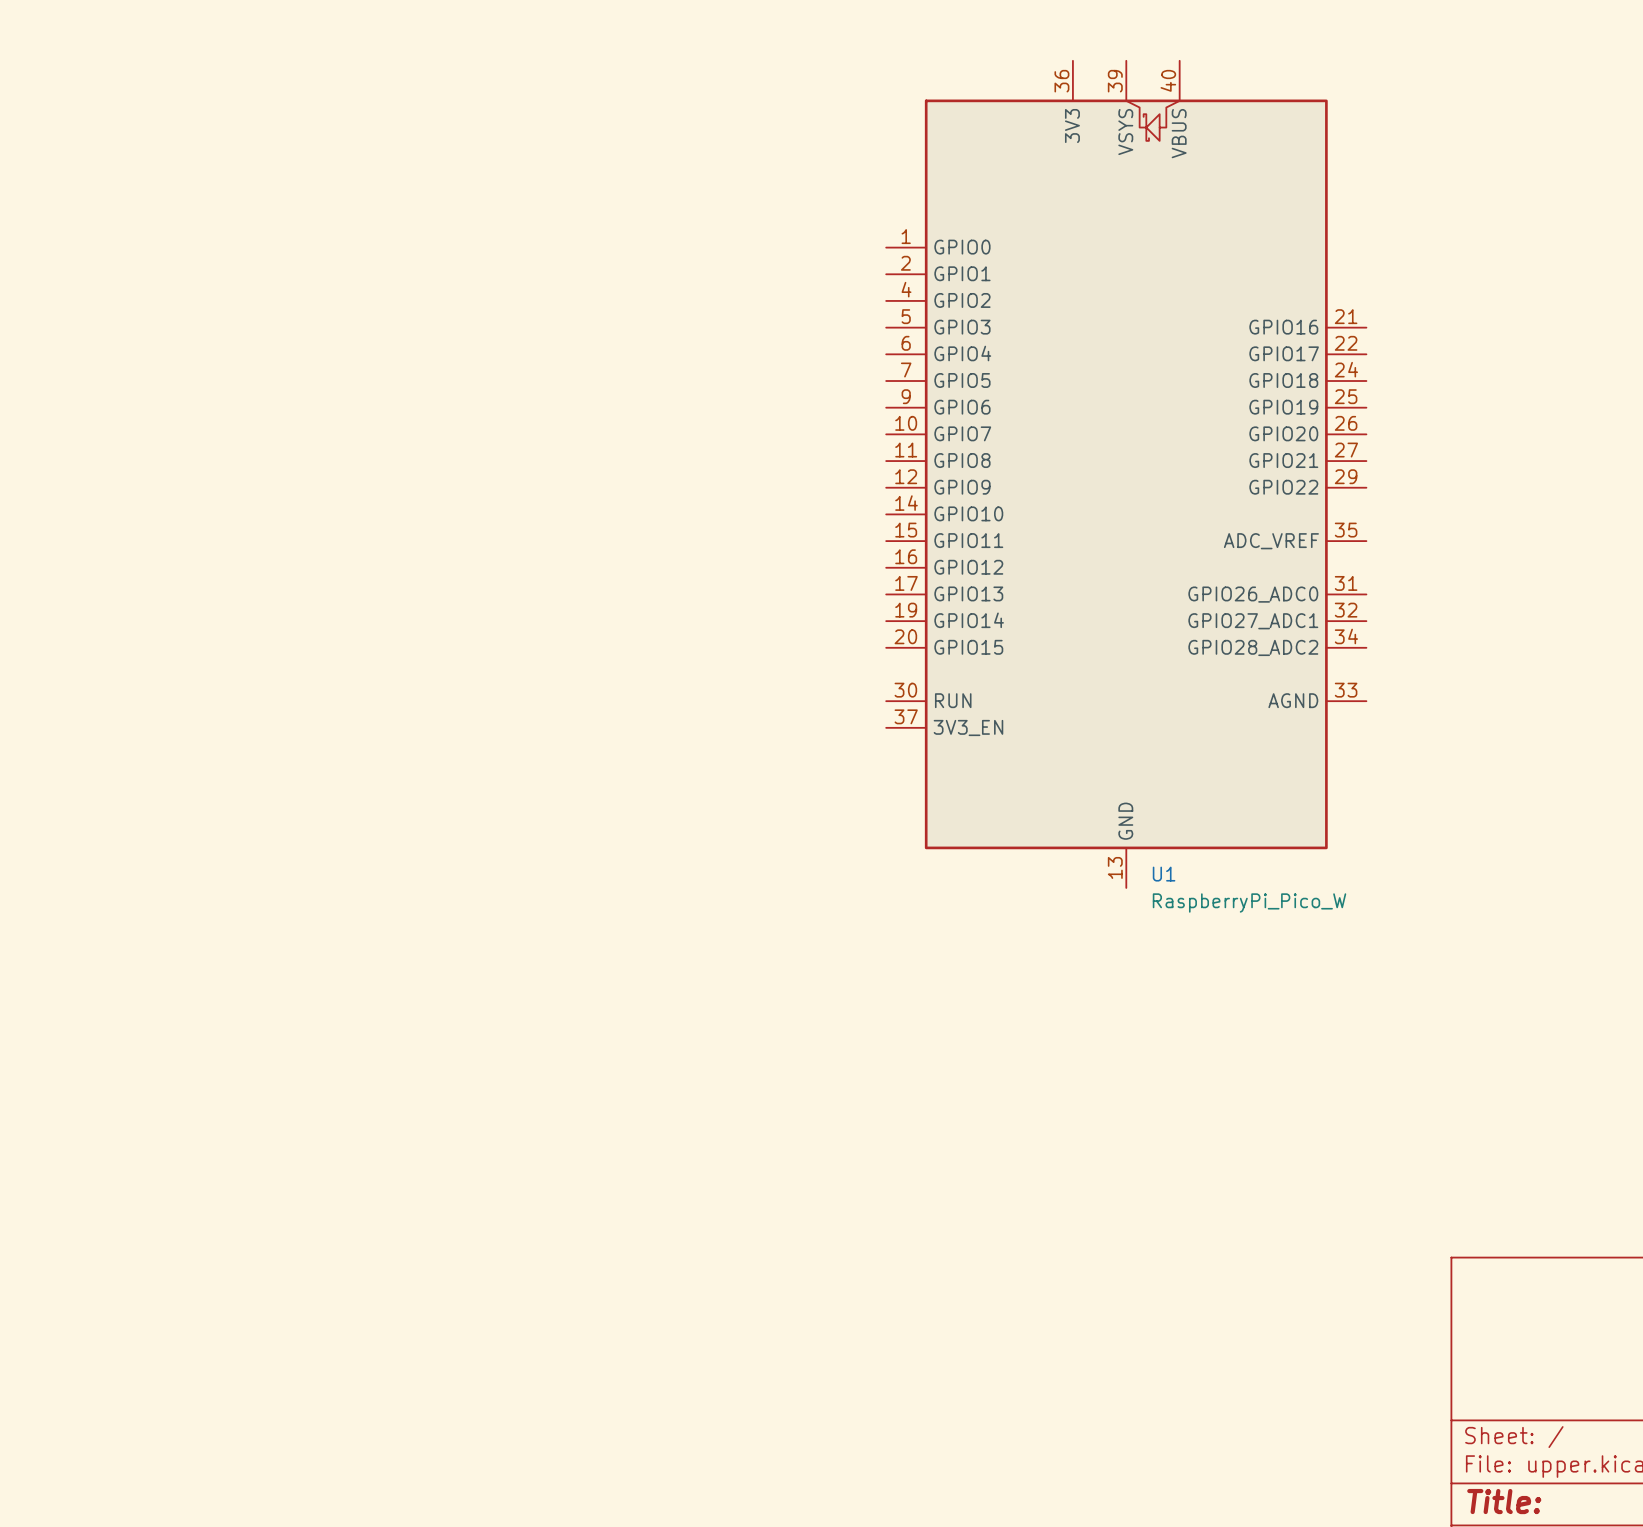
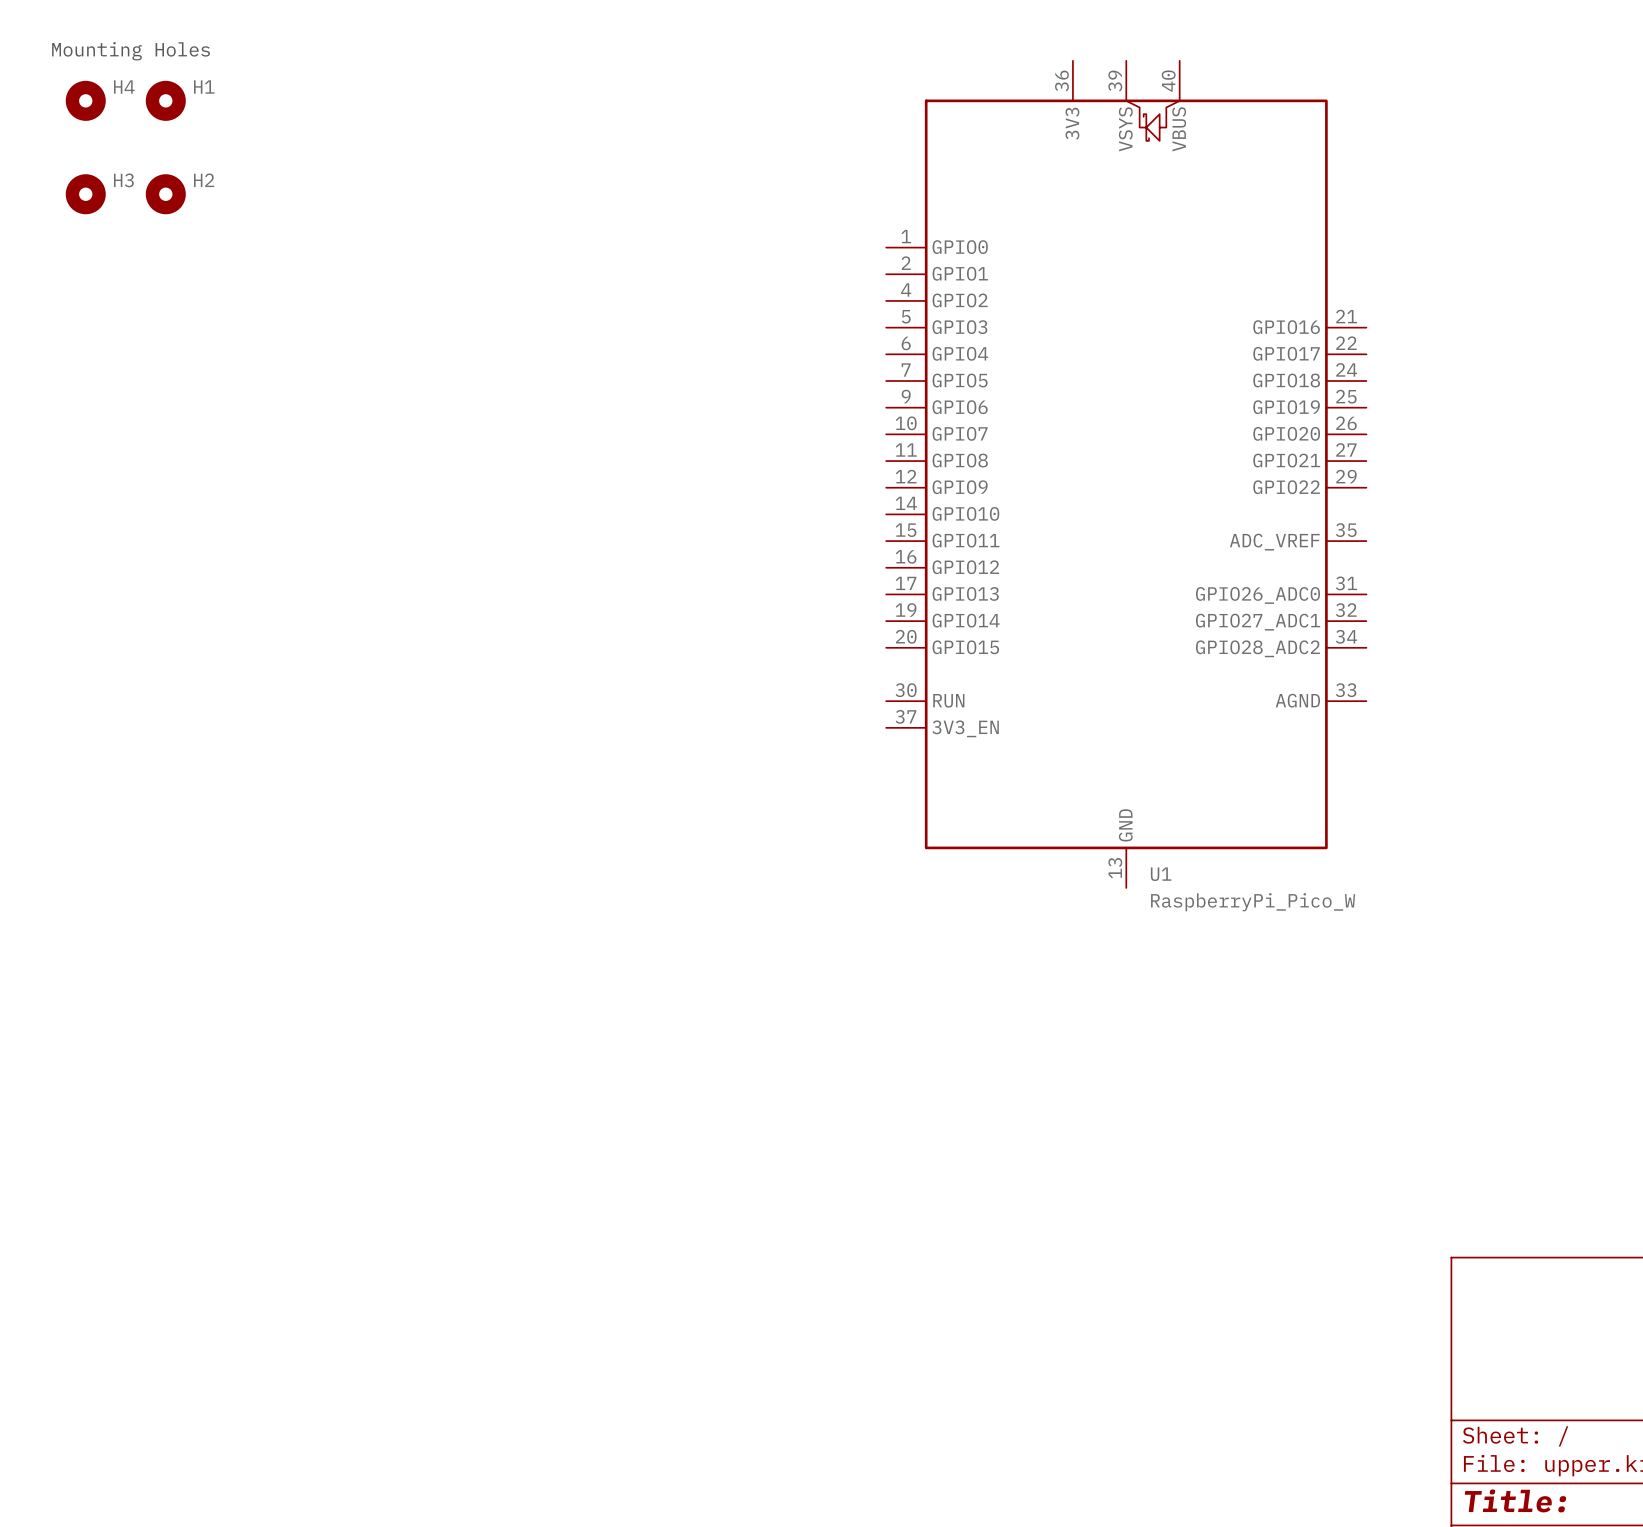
text: none -> Mounting Holes (131, 51)
H4: none -> (85, 100)
H1: none -> (165, 100)
H3: none -> (85, 194)
H2: none -> (165, 194)

